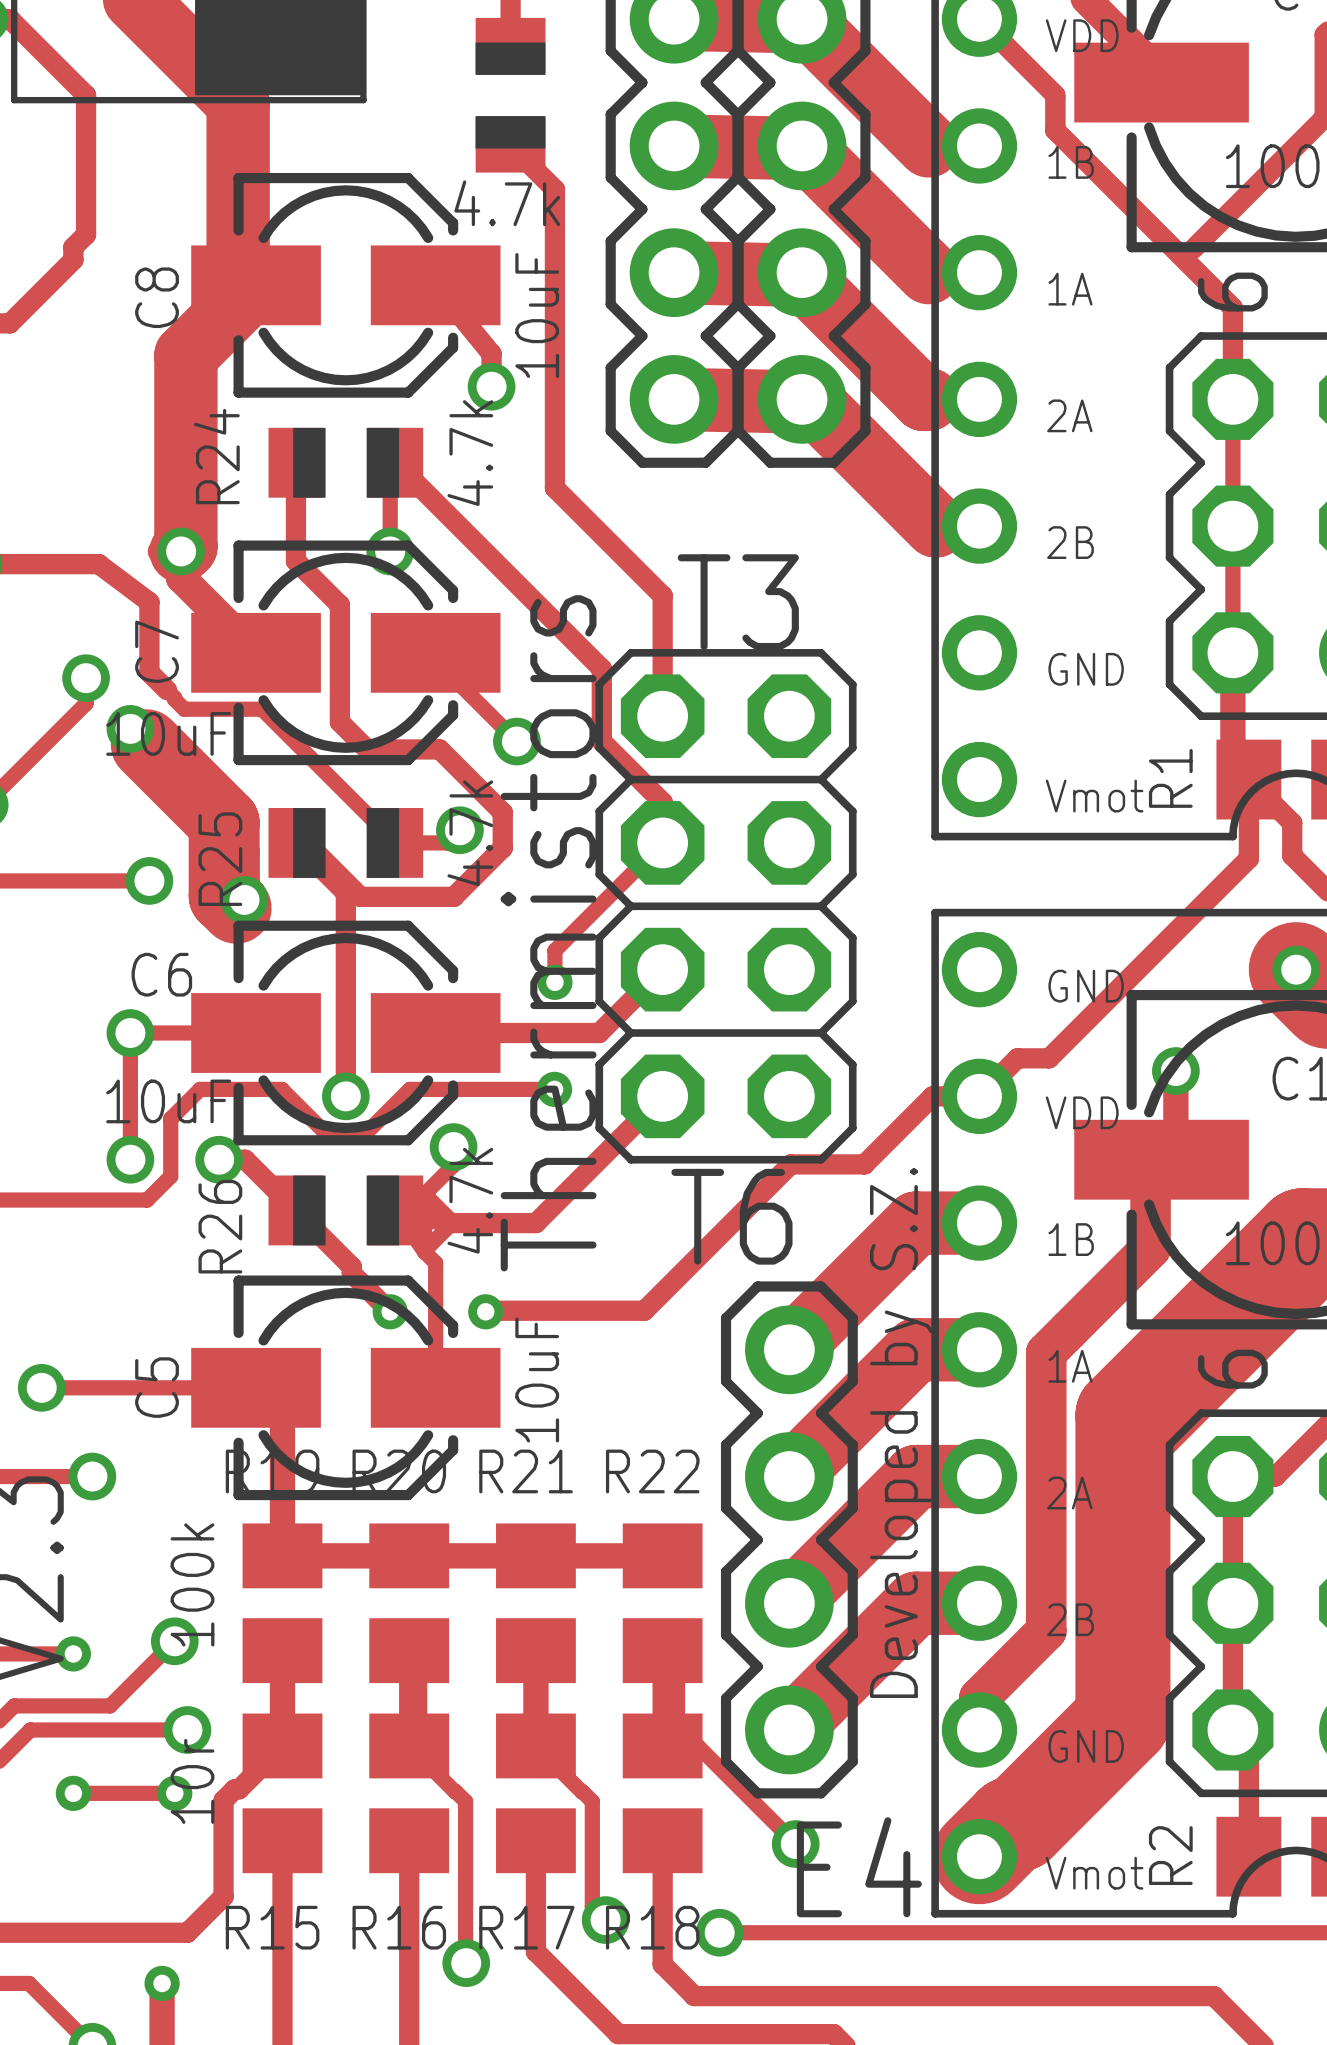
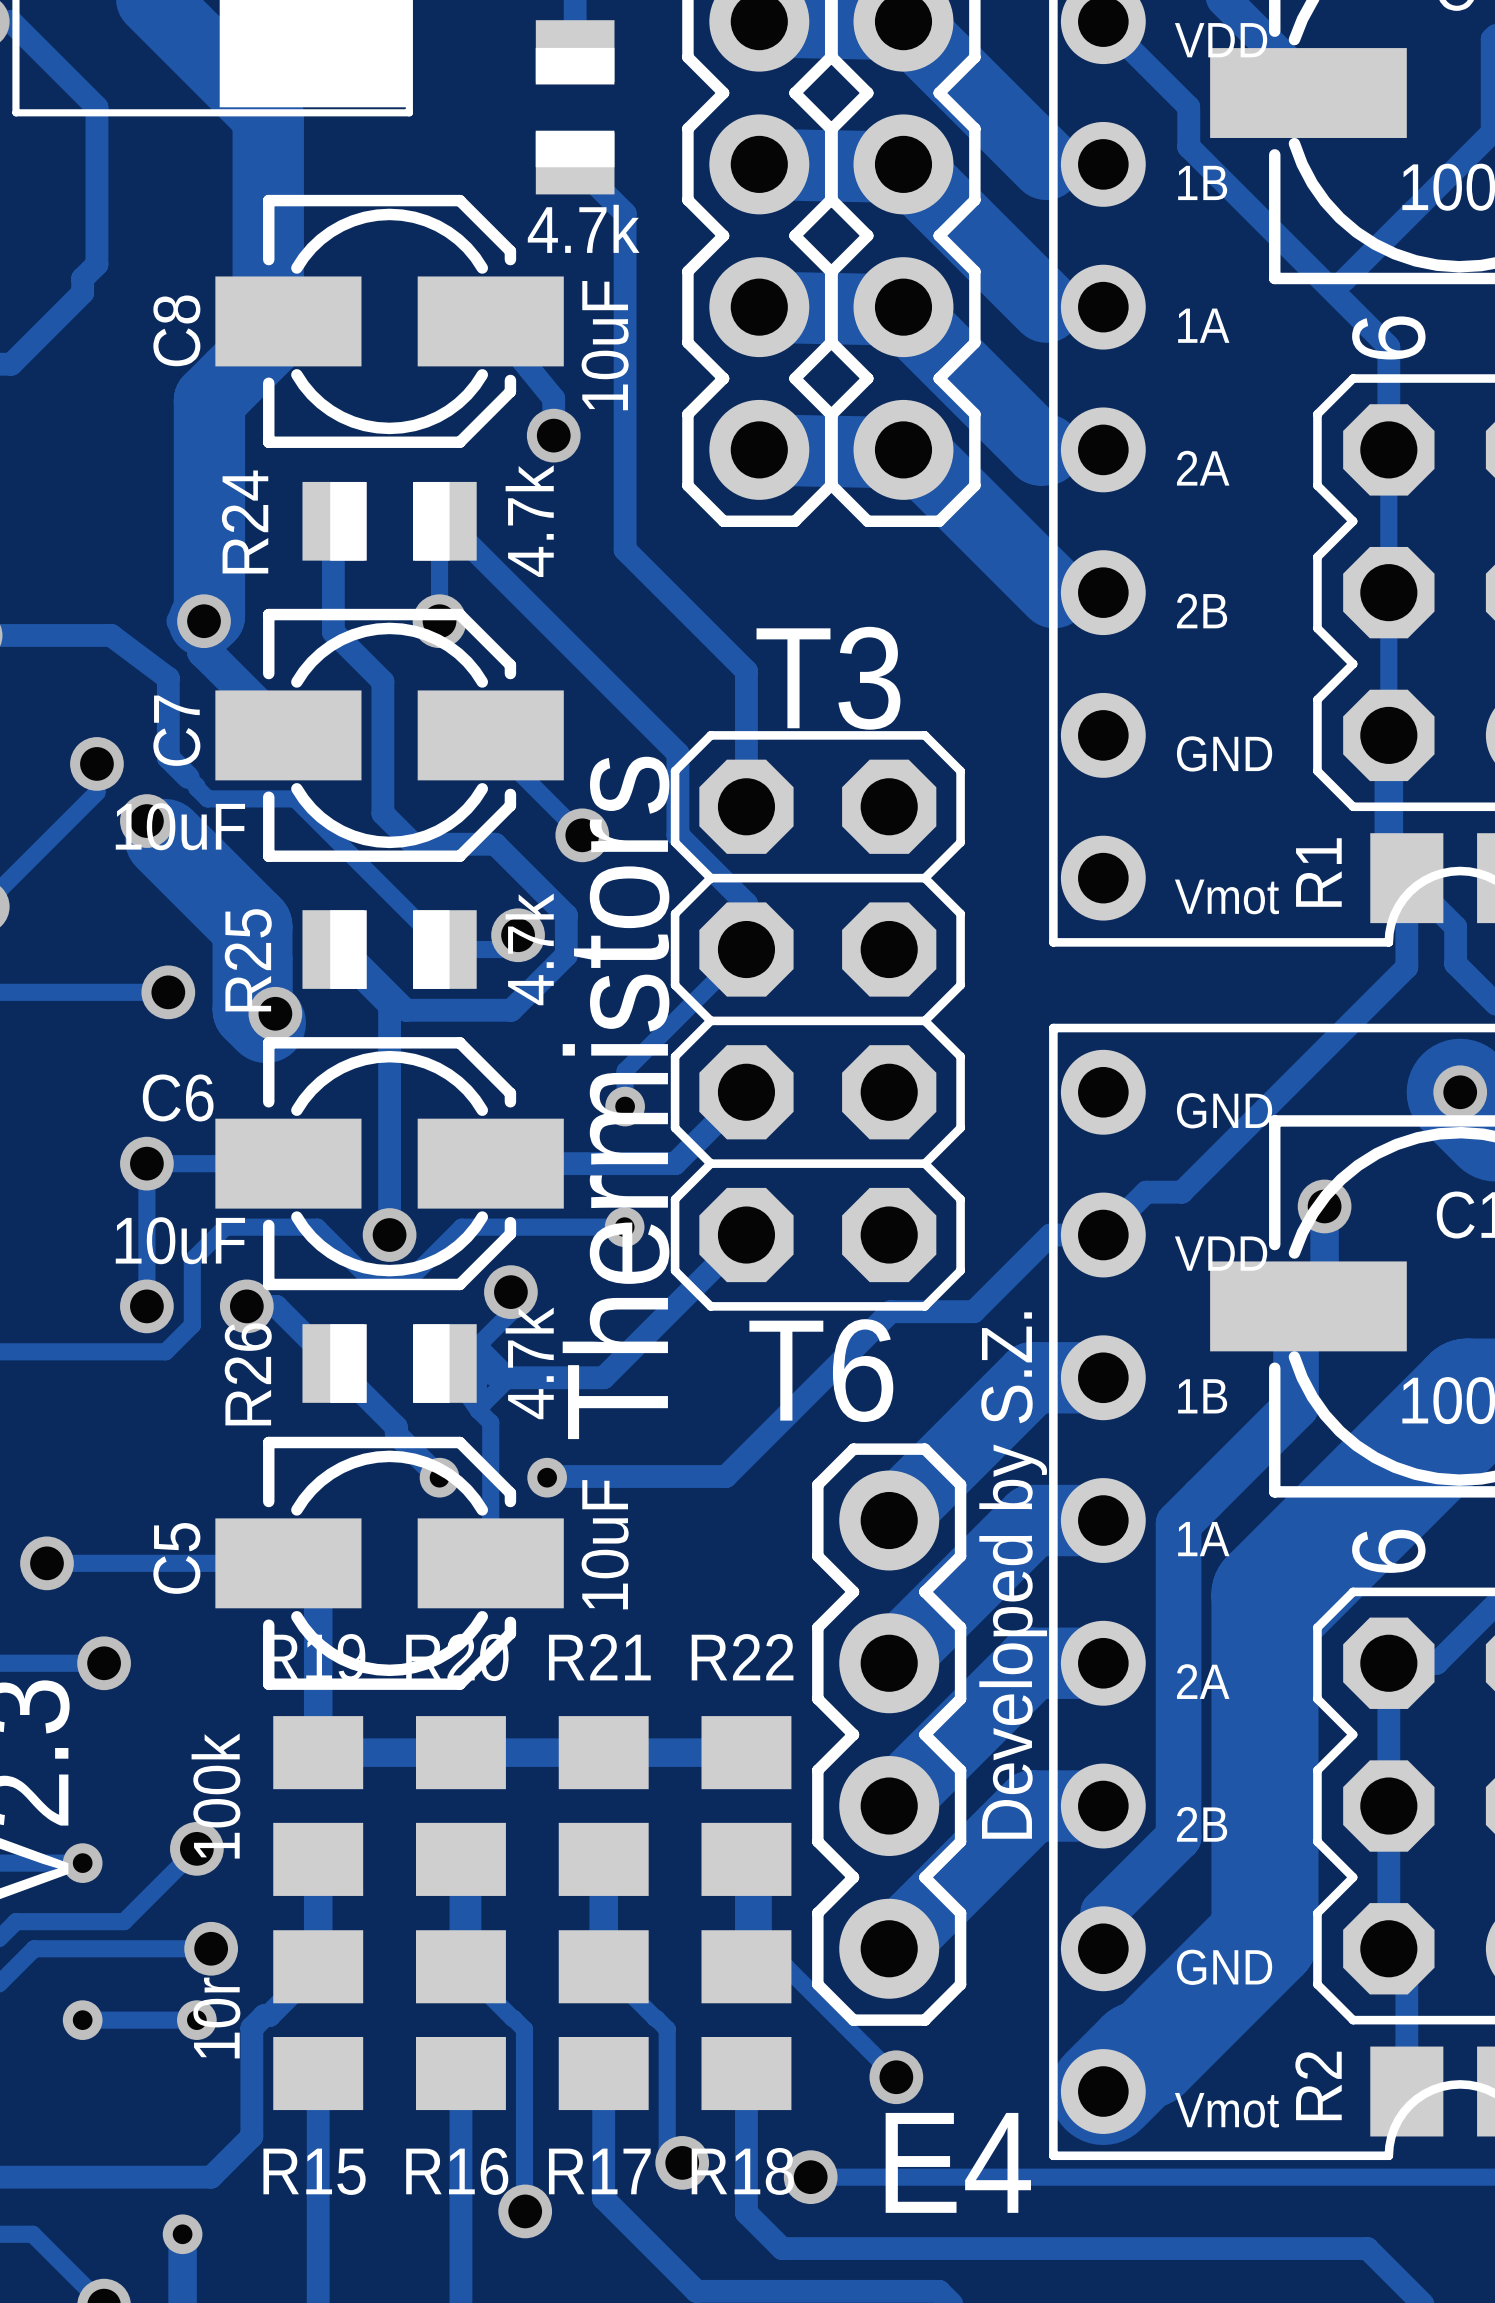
text position: E4 (859, 1867) -> E4 (958, 2162)

